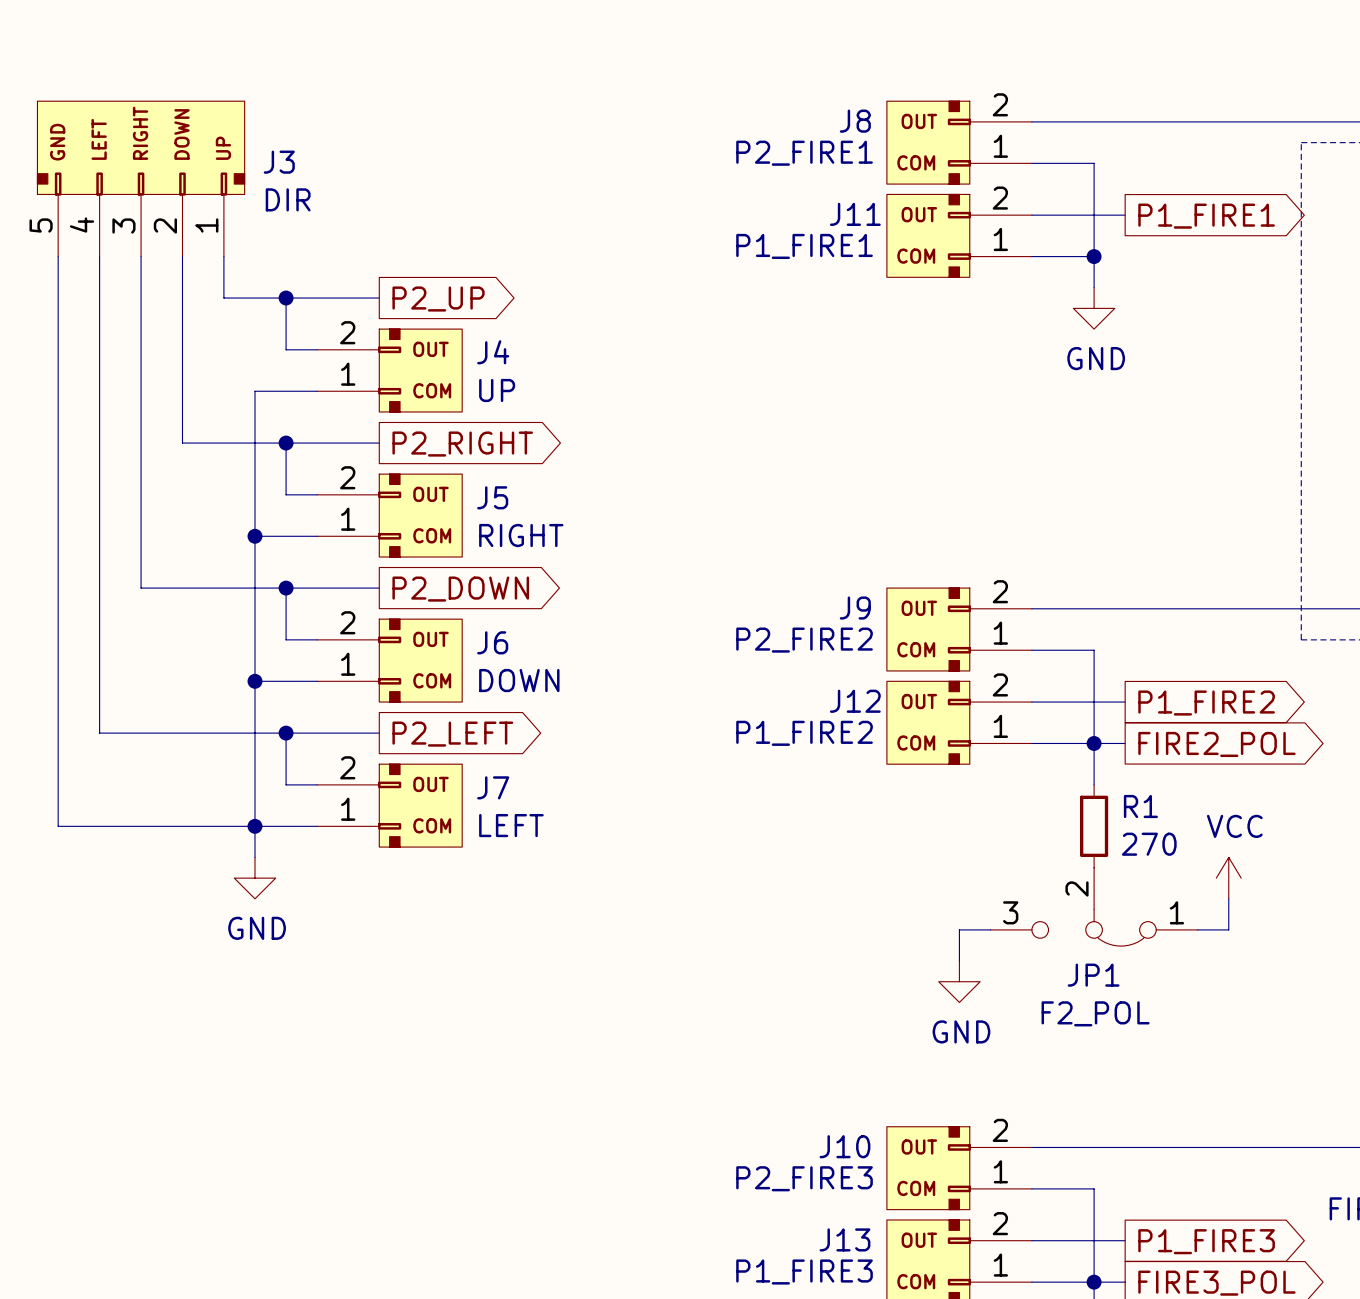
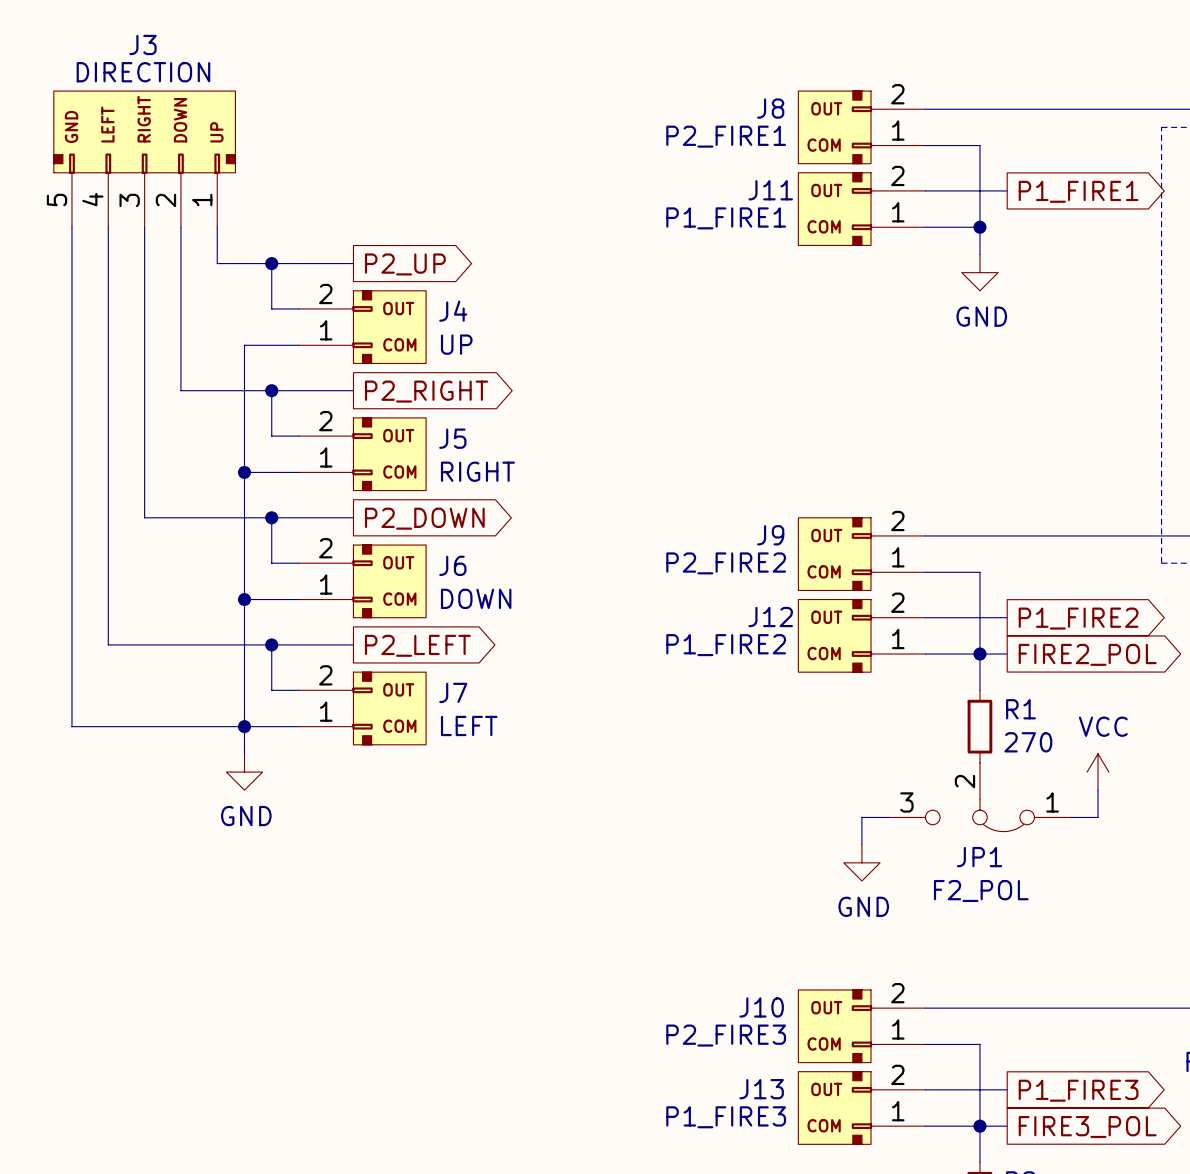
J3 name position: J3 (279, 162) -> J3 (143, 44)
J3 value: DIR (288, 199) -> DIRECTION (143, 72)

